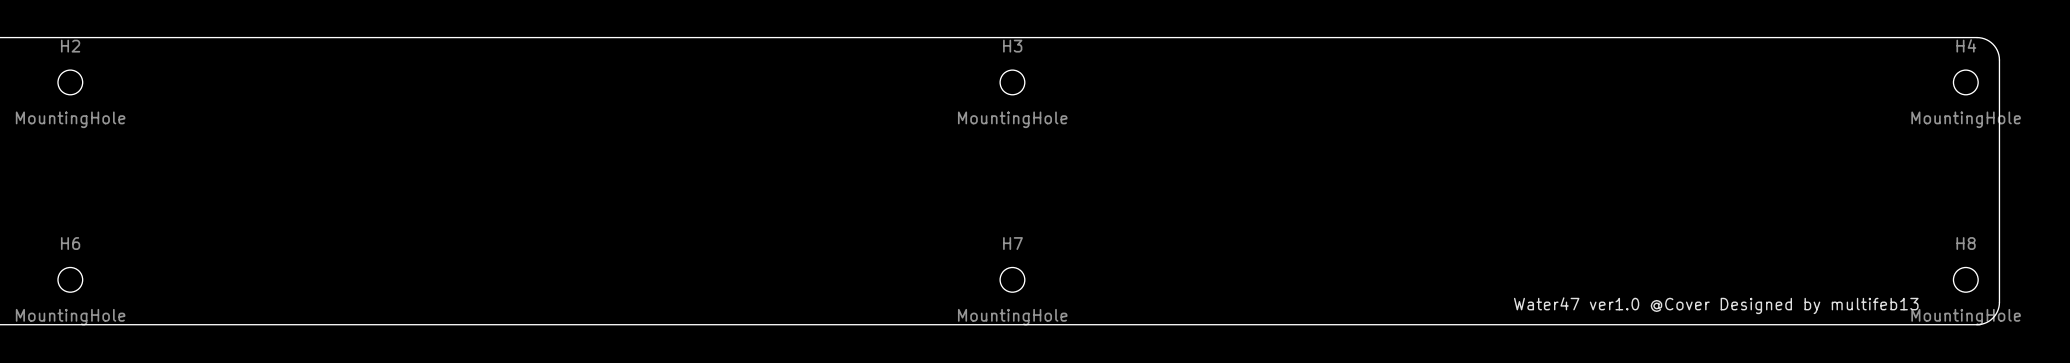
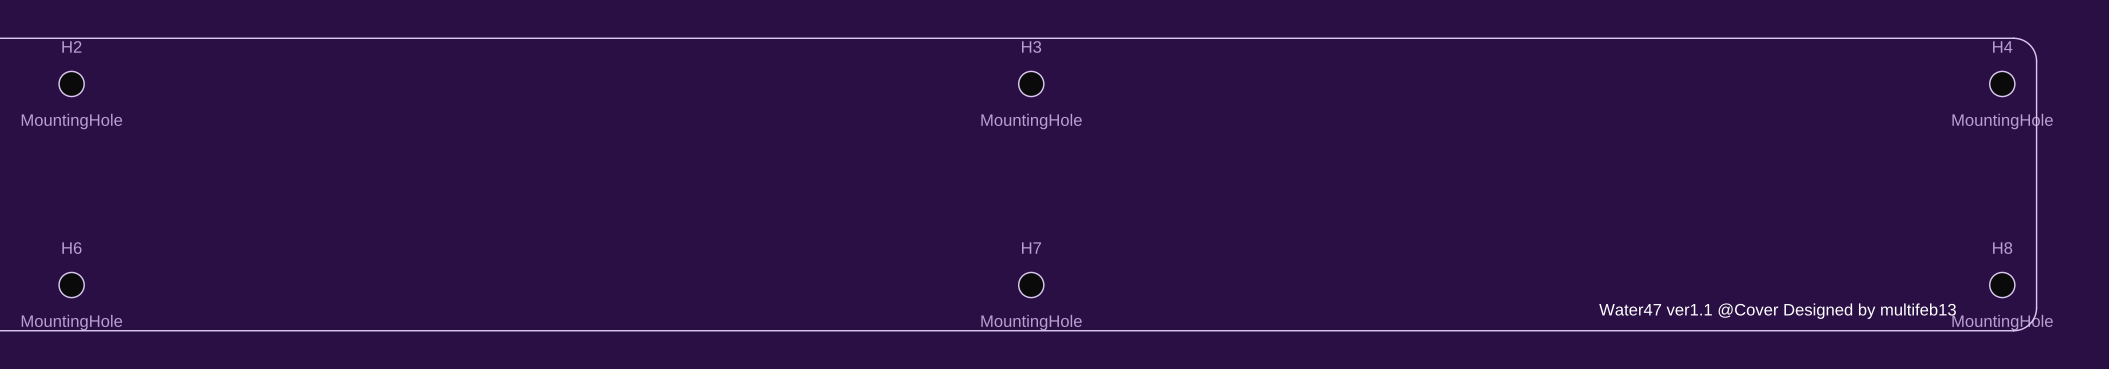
text: Water47 ver1.0 @Cover Designed by multifeb13 (1716, 305) -> Water47 ver1.1 @Cover Designed by multifeb13 (1777, 311)

